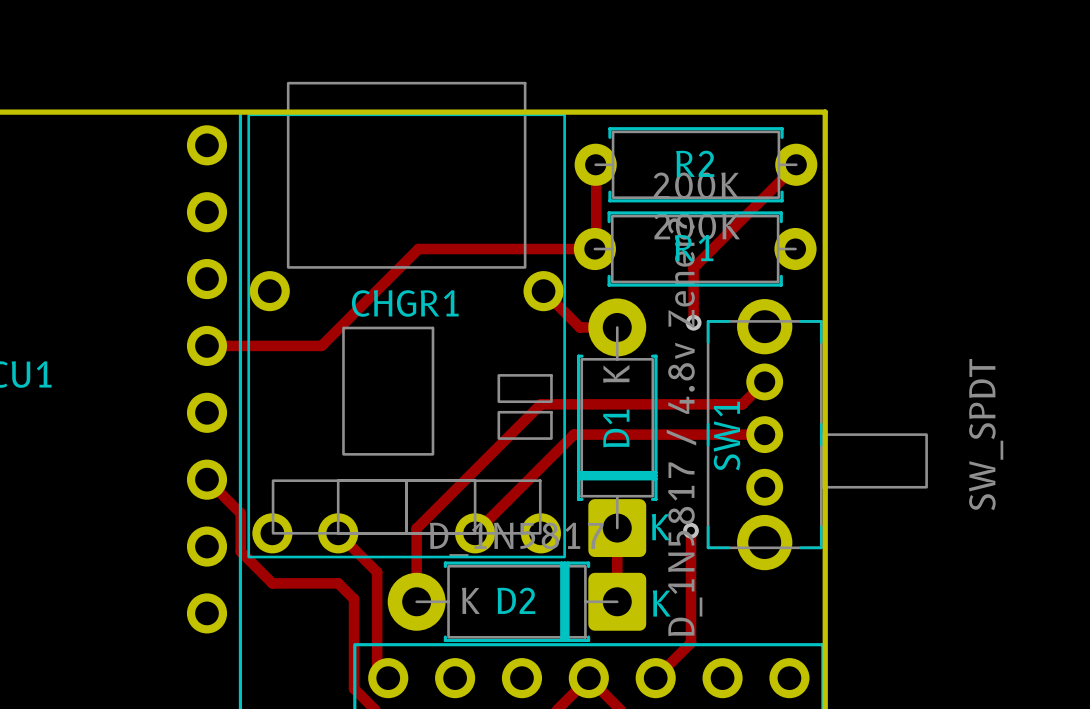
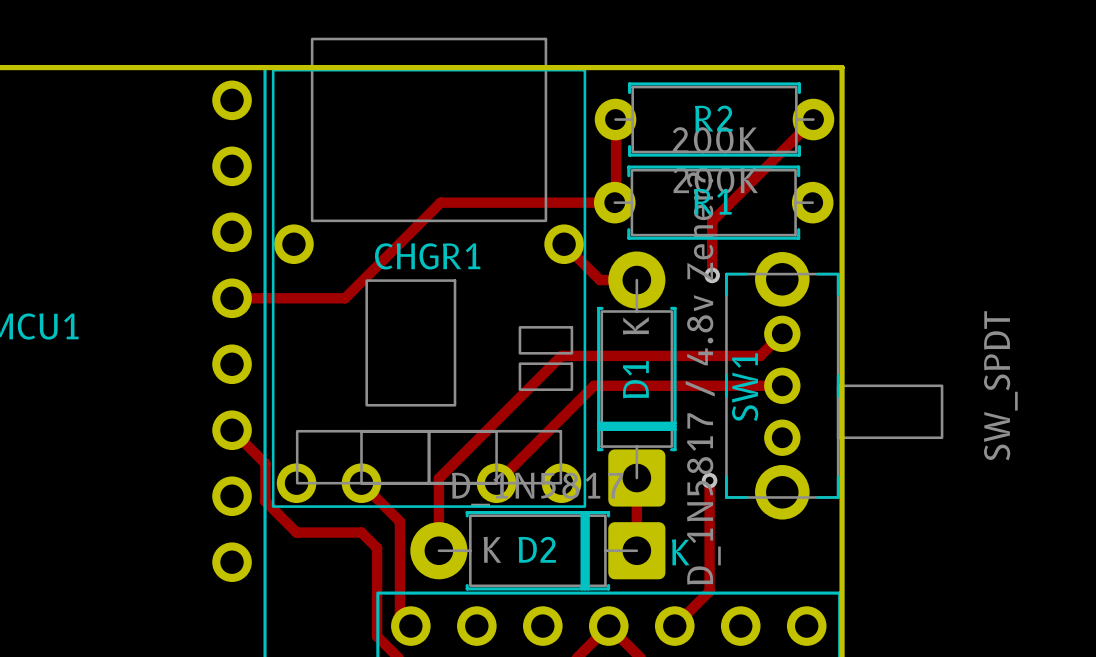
D1 text: K (660, 527) -> none

